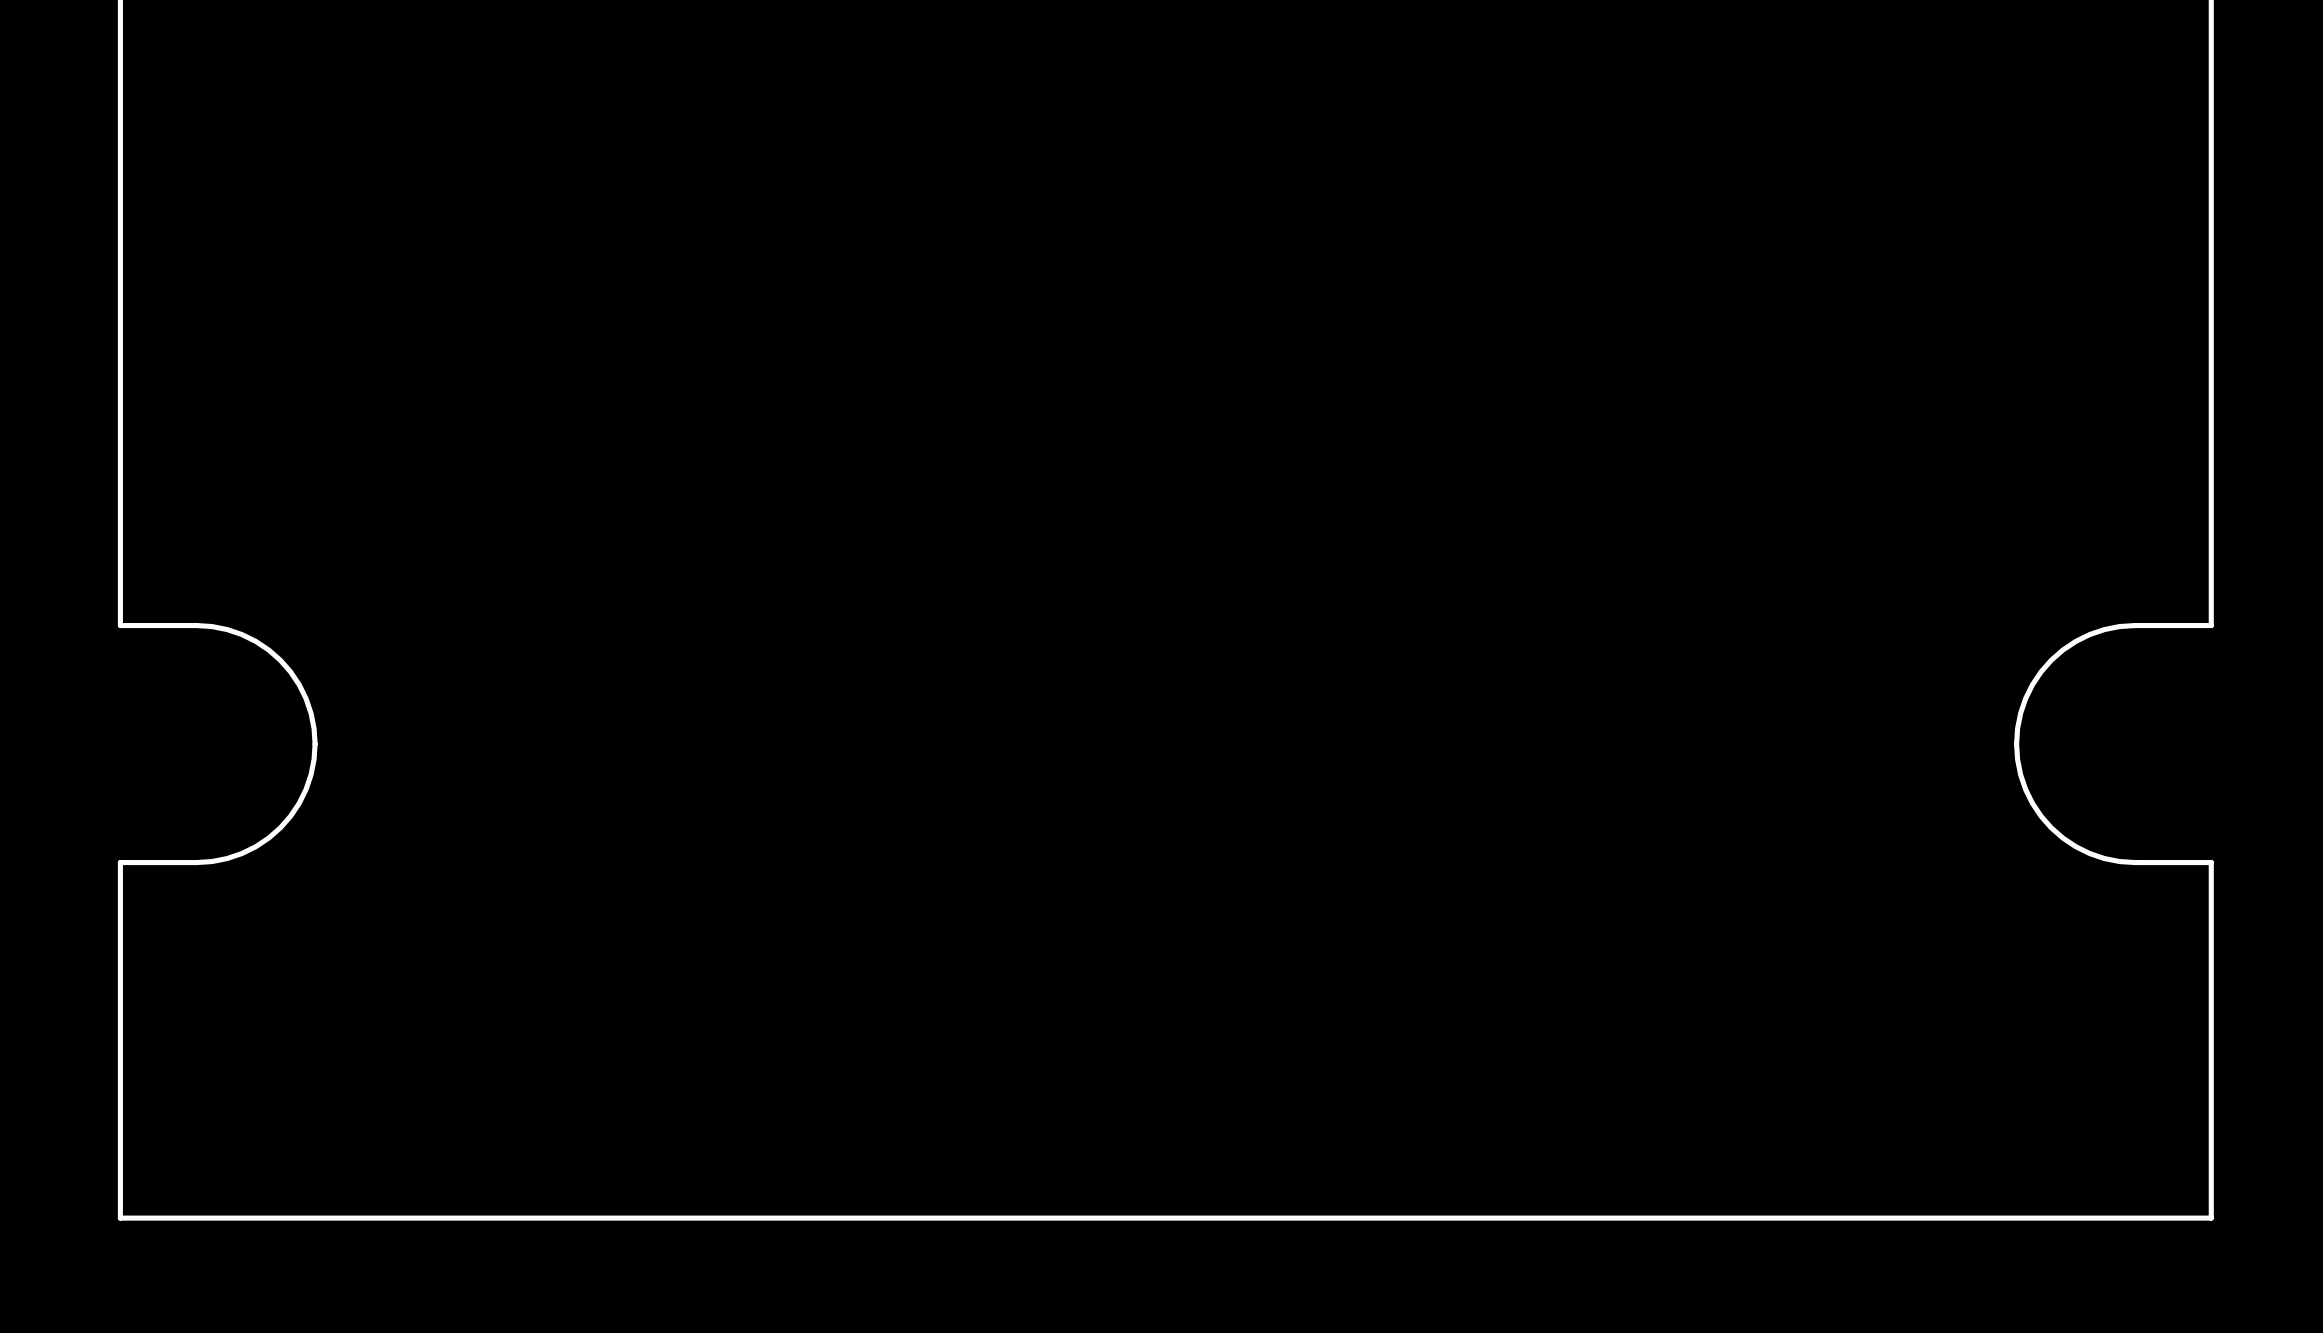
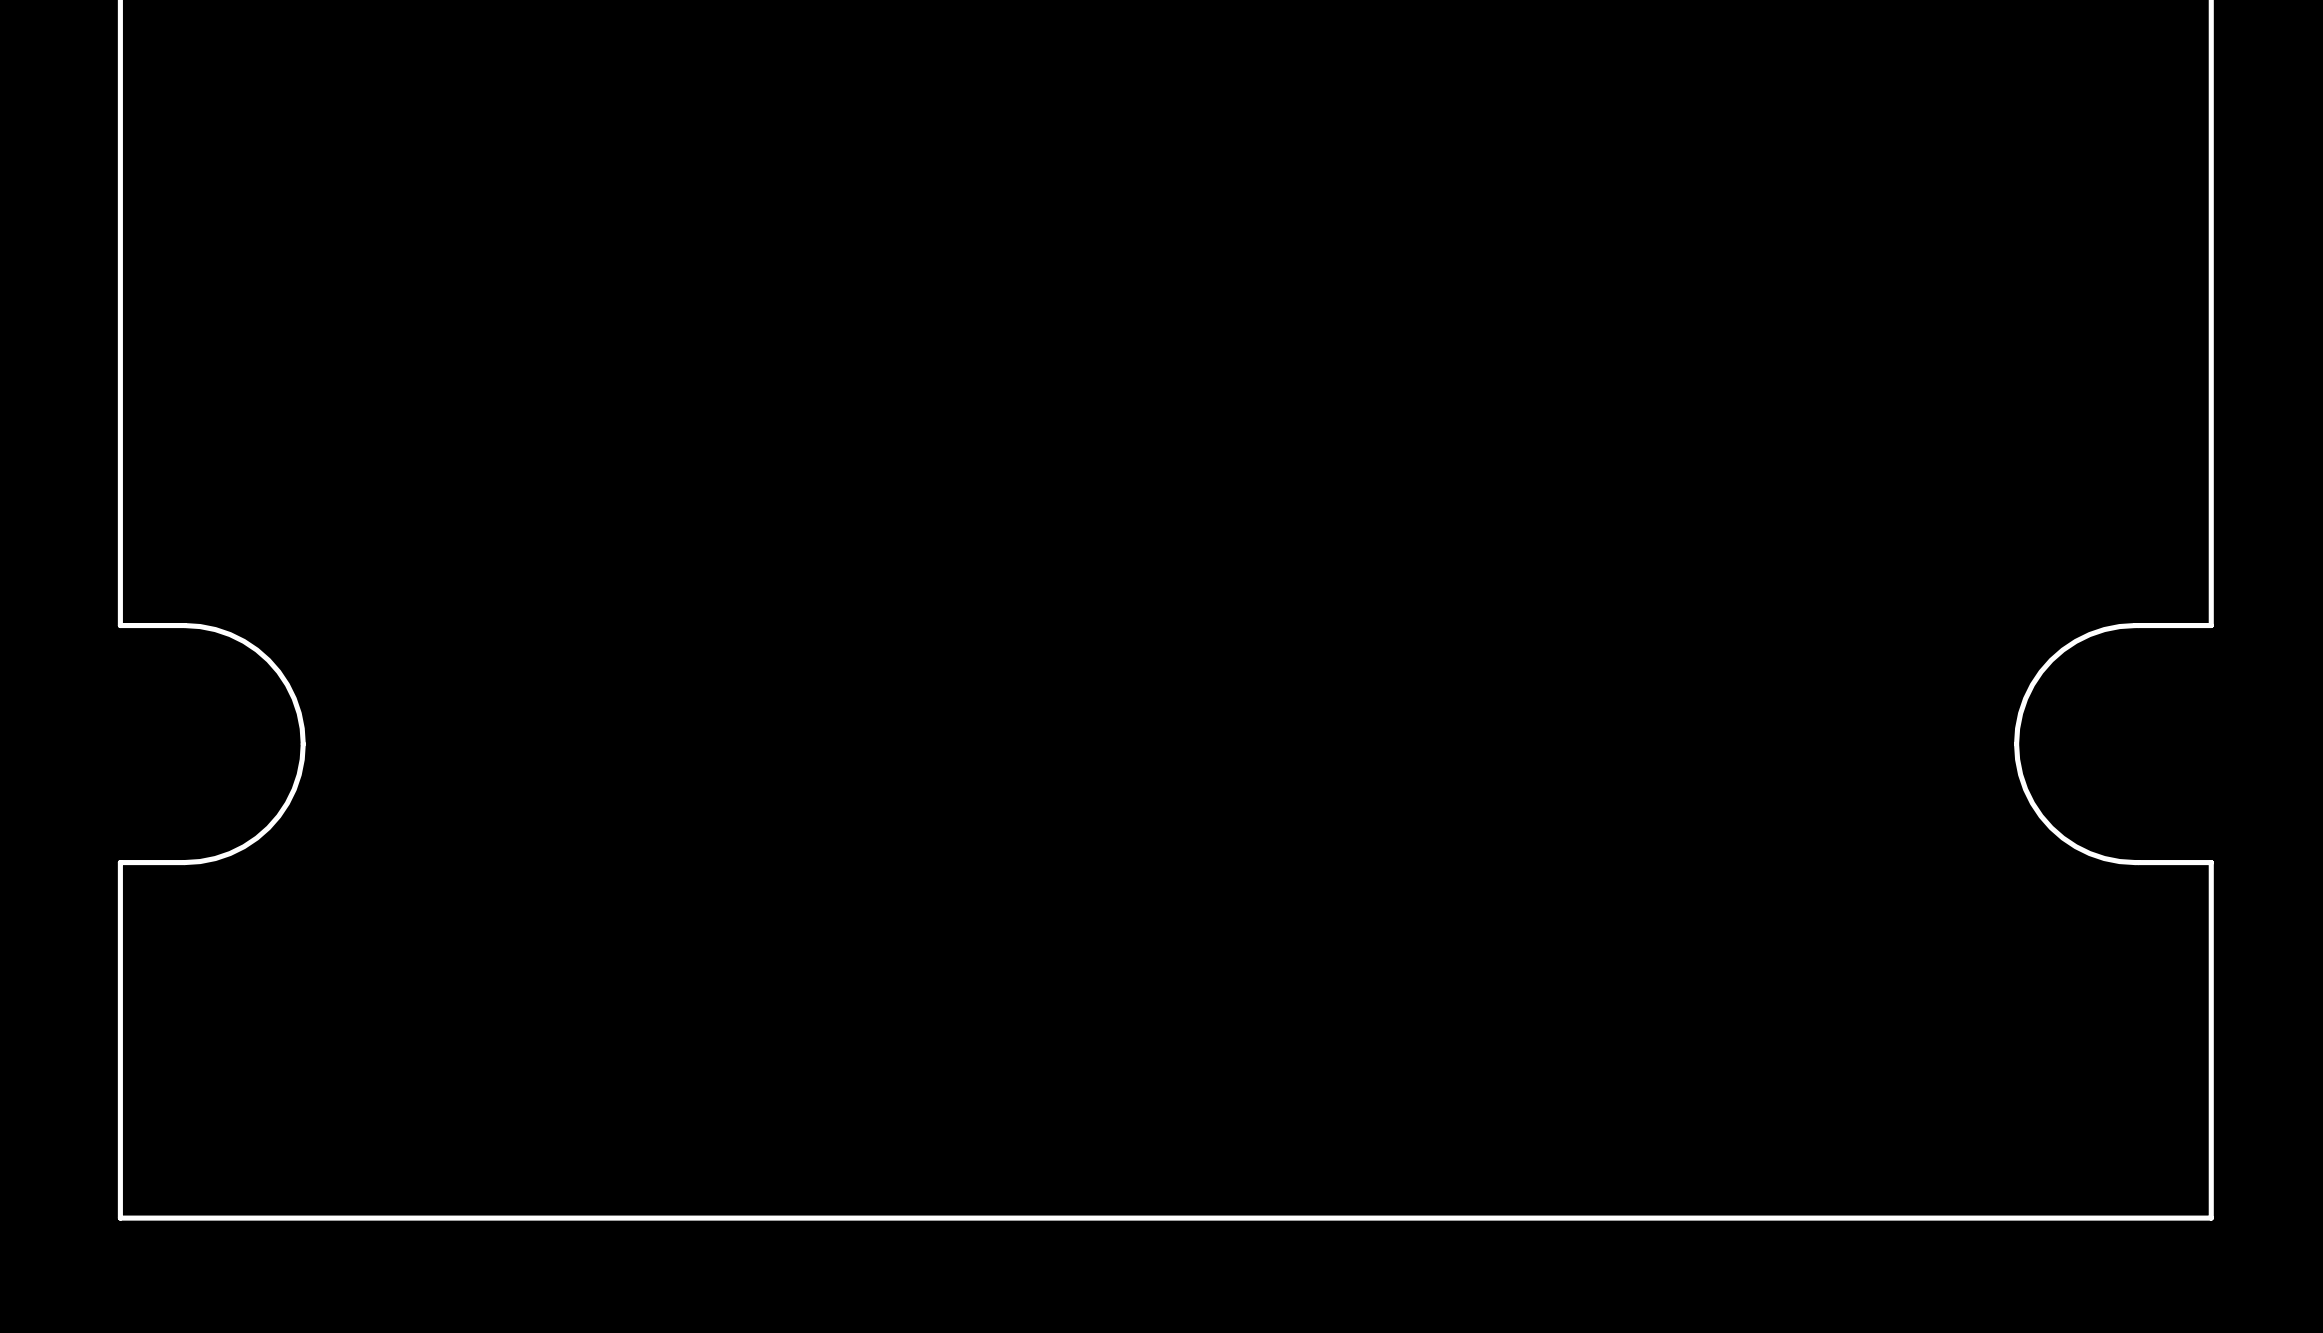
board edge: (184, 625) (212, 626) (241, 634) (255, 641) (280, 660) (290, 671) (306, 698) (311, 713) (315, 744) (311, 774) (306, 789) (290, 816) (280, 827) (255, 846) (241, 853) (212, 861) (184, 862) -> (184, 625) (200, 626) (230, 634) (243, 641) (268, 660) (287, 684) (294, 698) (302, 728) (303, 744) (302, 759) (294, 789) (287, 803) (268, 827) (243, 846) (230, 853) (215, 858) (184, 862)

